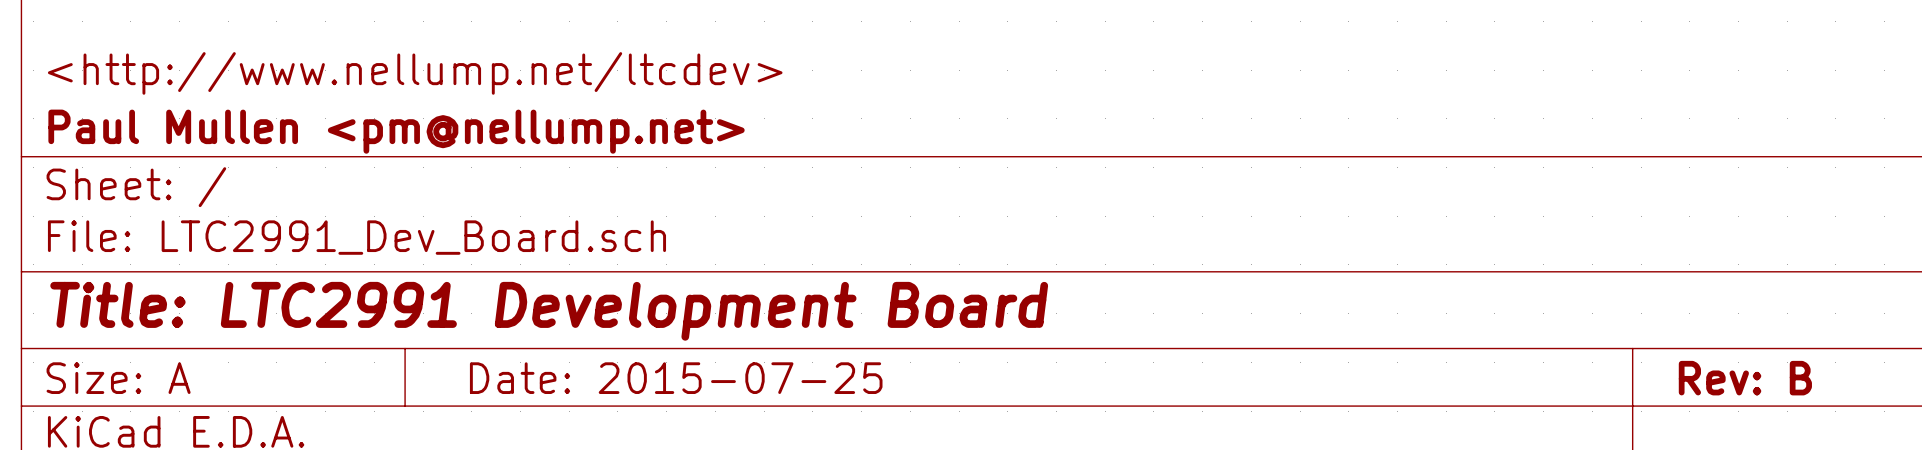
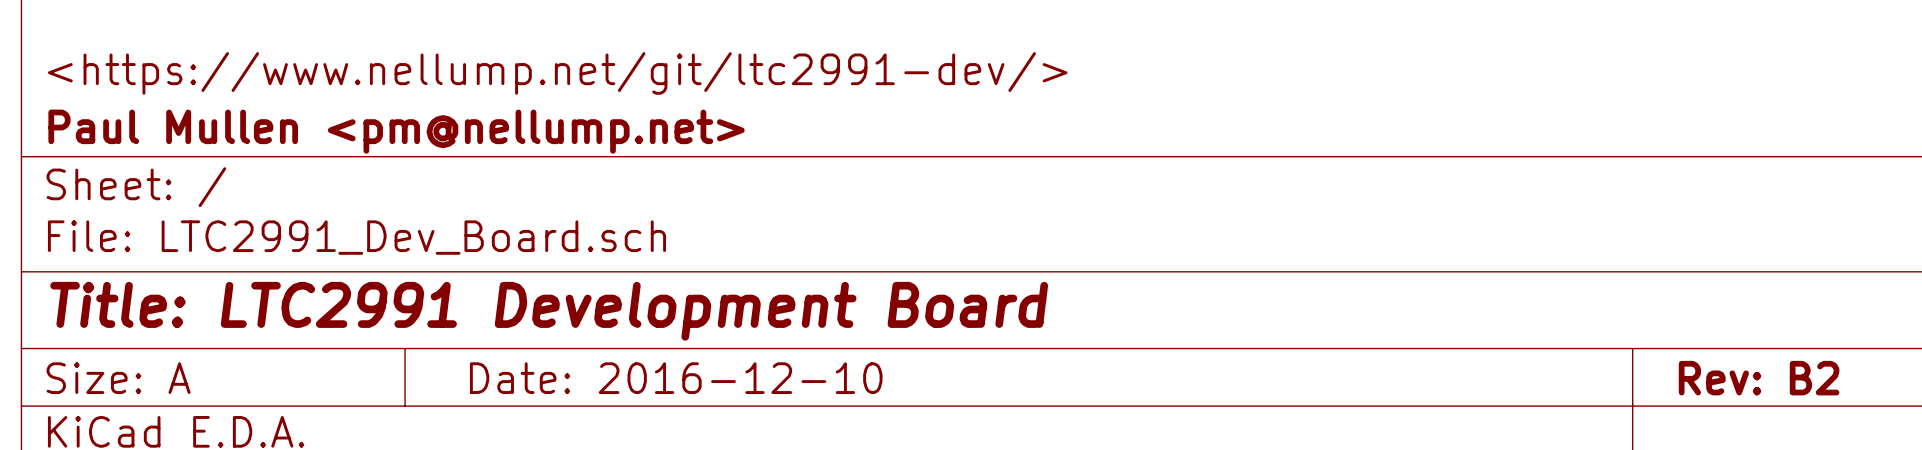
title block: <http://www.nellump.net/ltcdev> (415, 73) -> <https://www.nellump.net/git/ltc2991-dev/> (557, 73)
title block: Date: 2015-07-25 (676, 378) -> Date: 2016-12-10 (676, 378)
title block: Rev: B (1745, 378) -> Rev: B2 (1759, 378)

